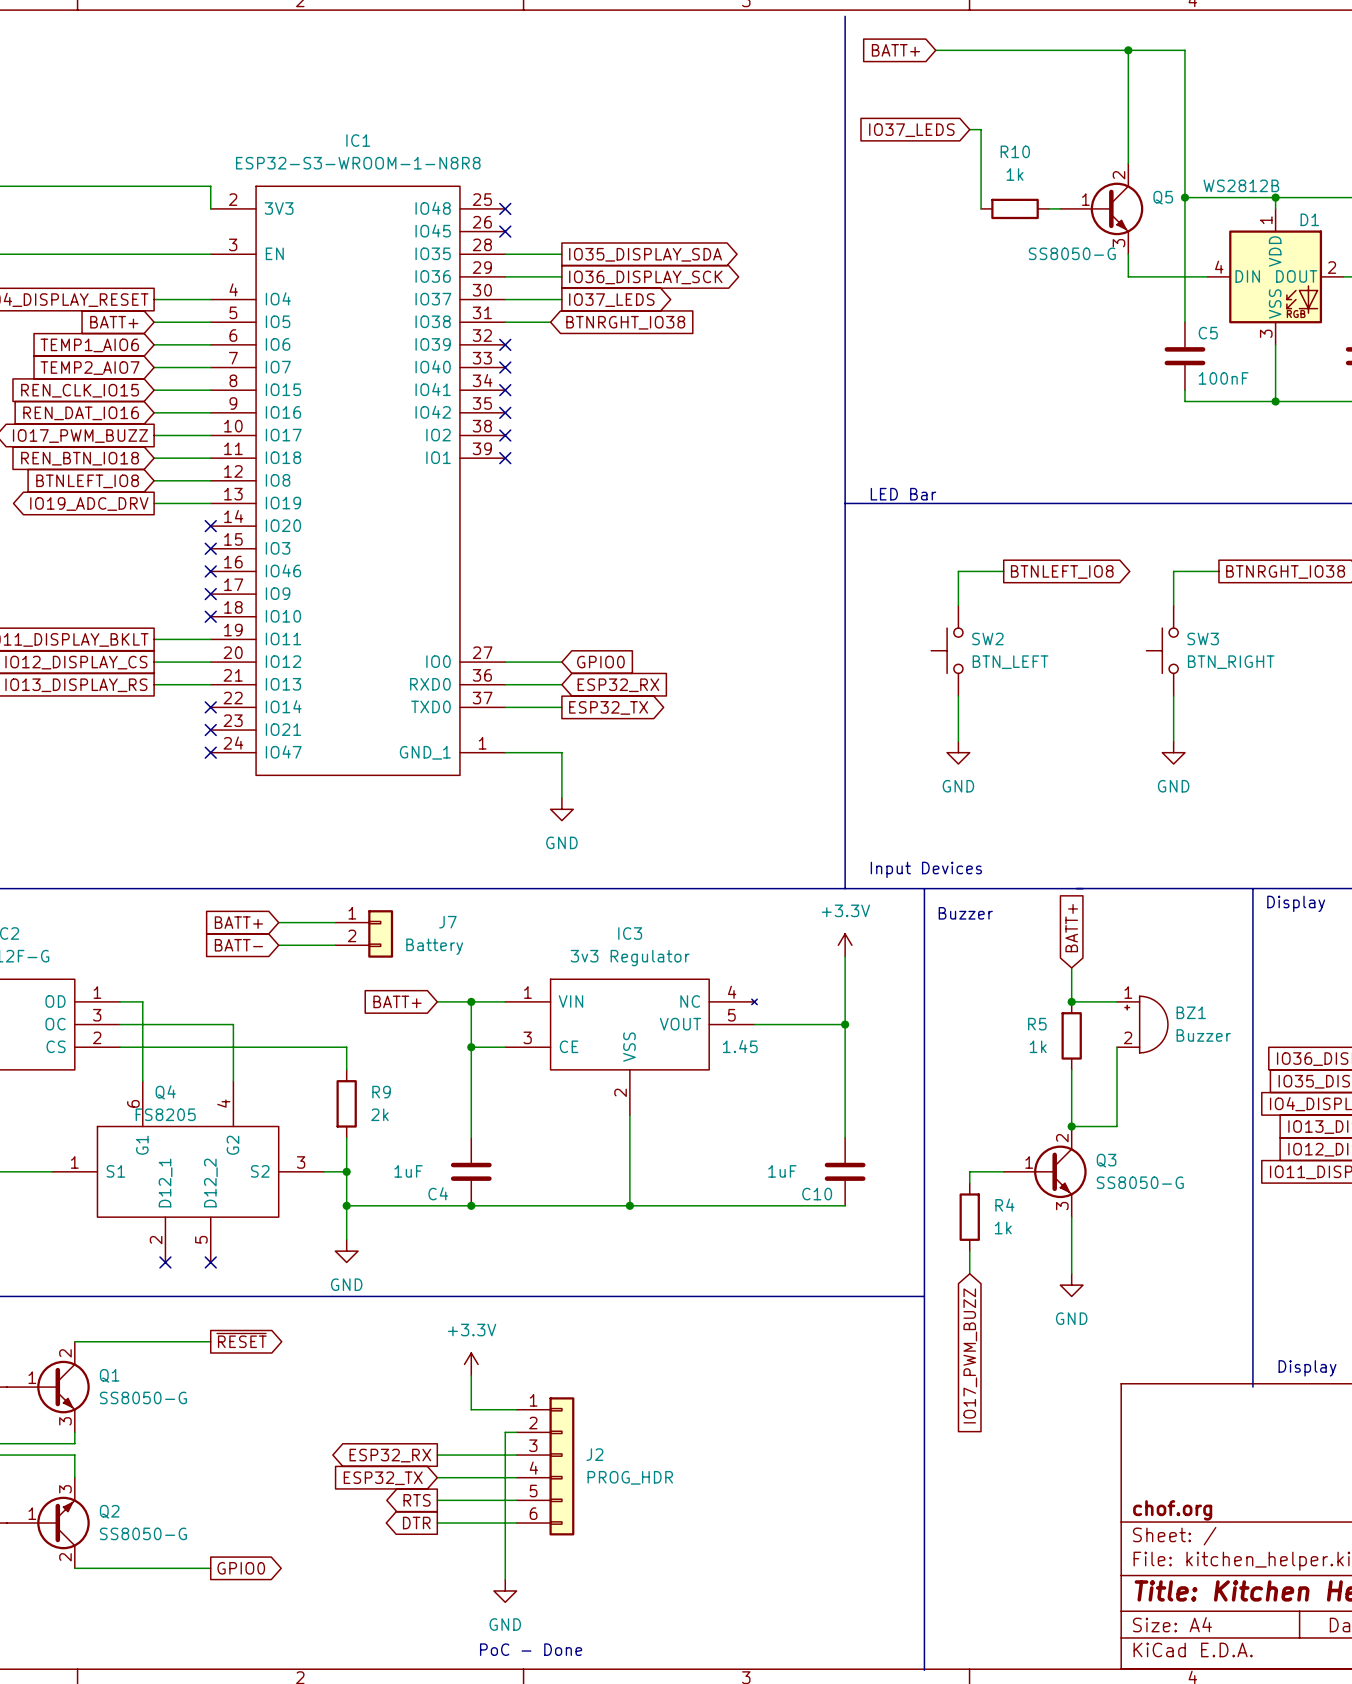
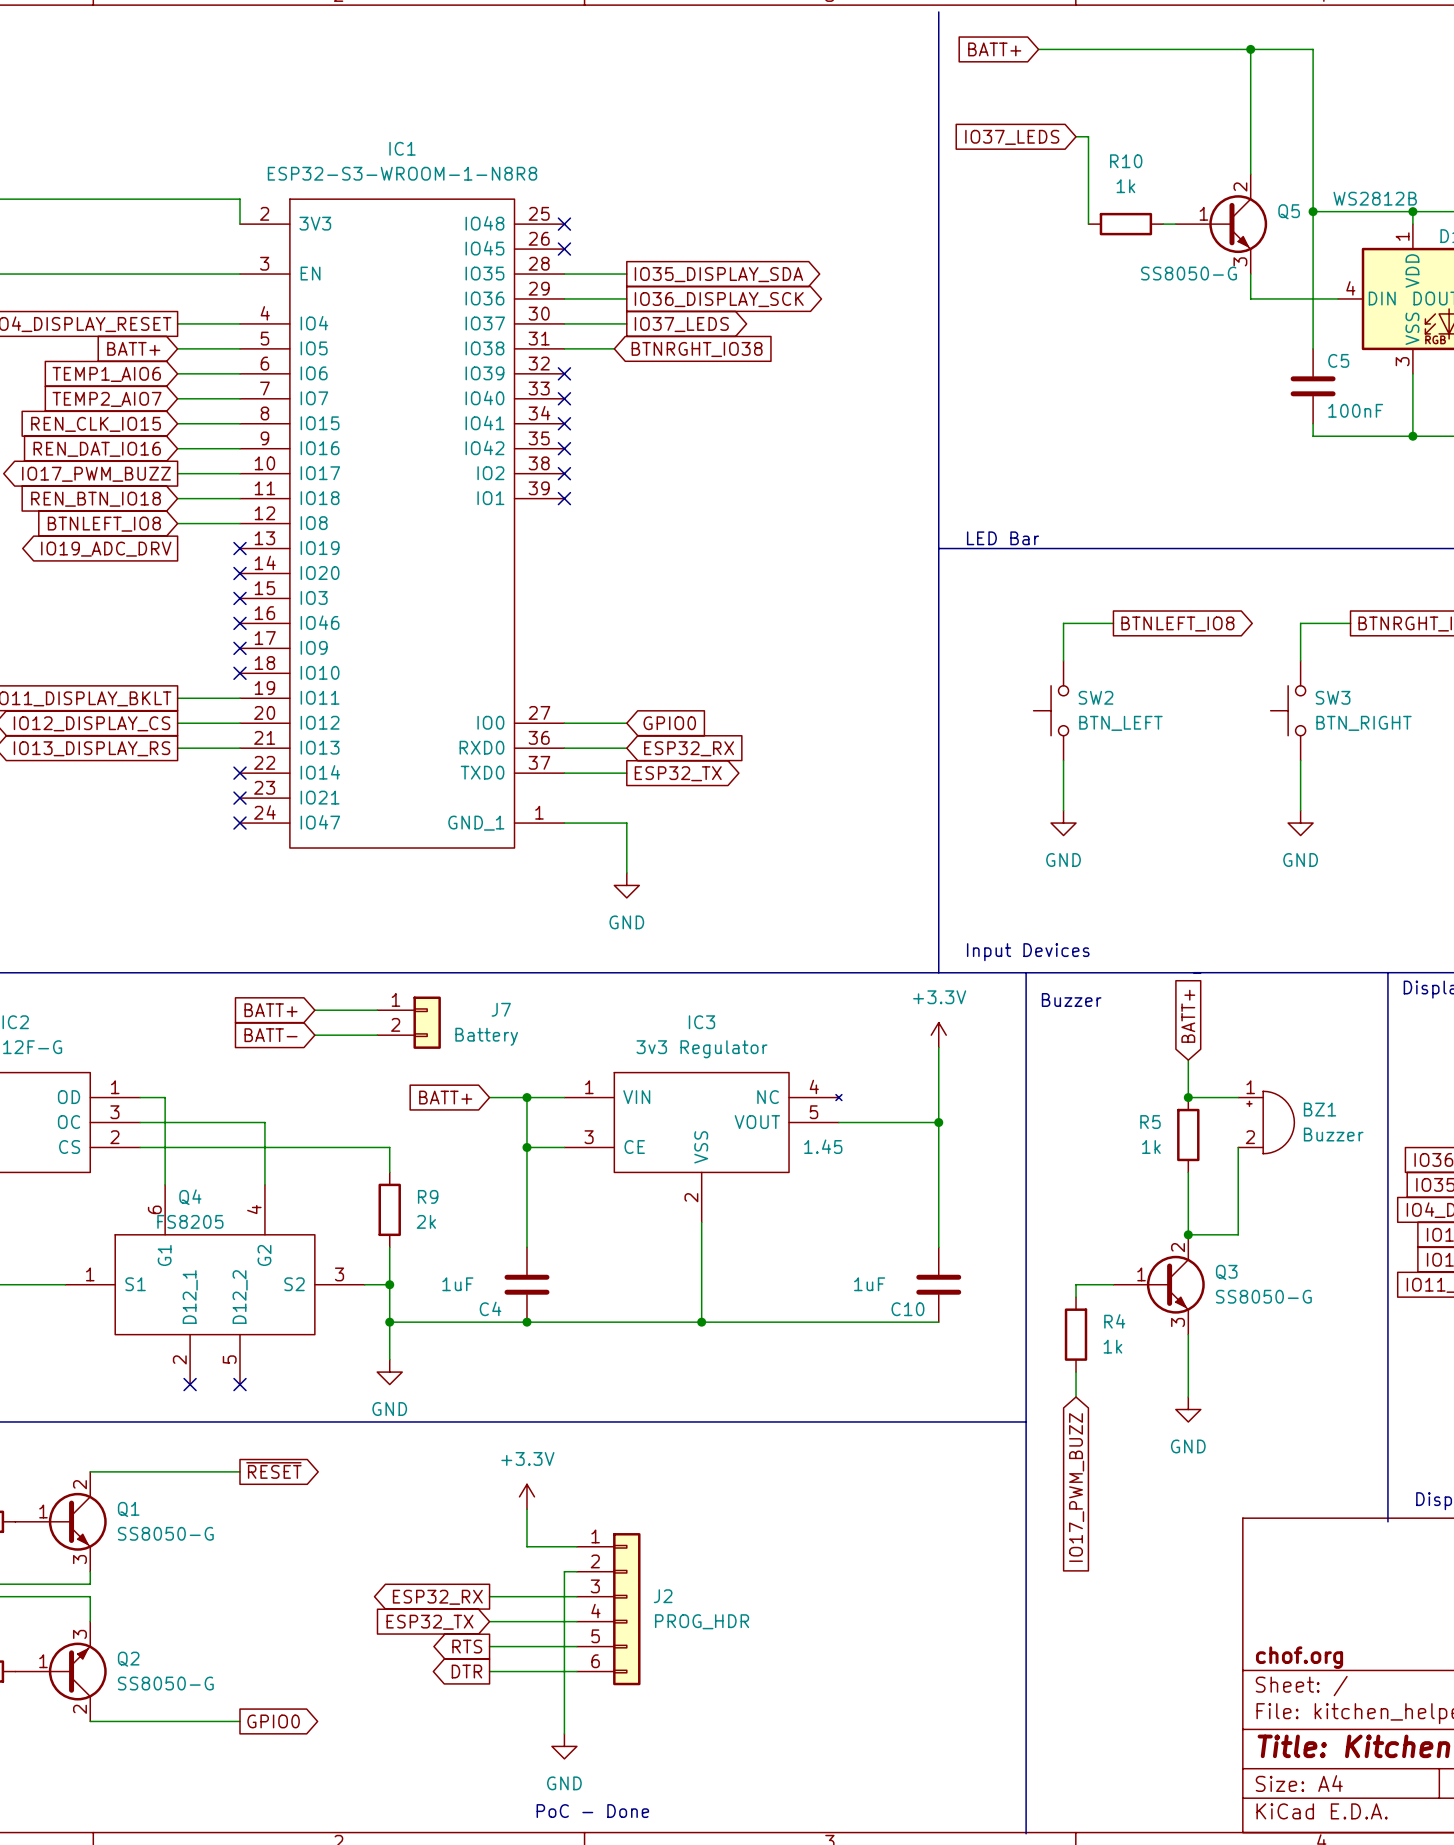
wire: (154, 503) (210, 503) -> none
no-connect mark: none -> (239, 548)

